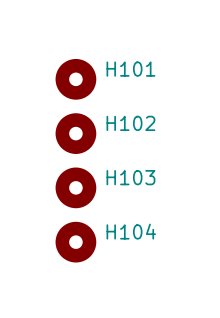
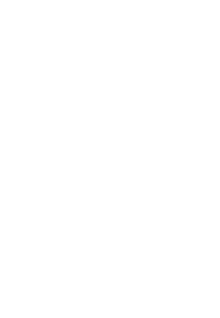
H101: (75, 79) -> none
H102: (75, 133) -> none
H103: (75, 187) -> none
H104: (75, 242) -> none

